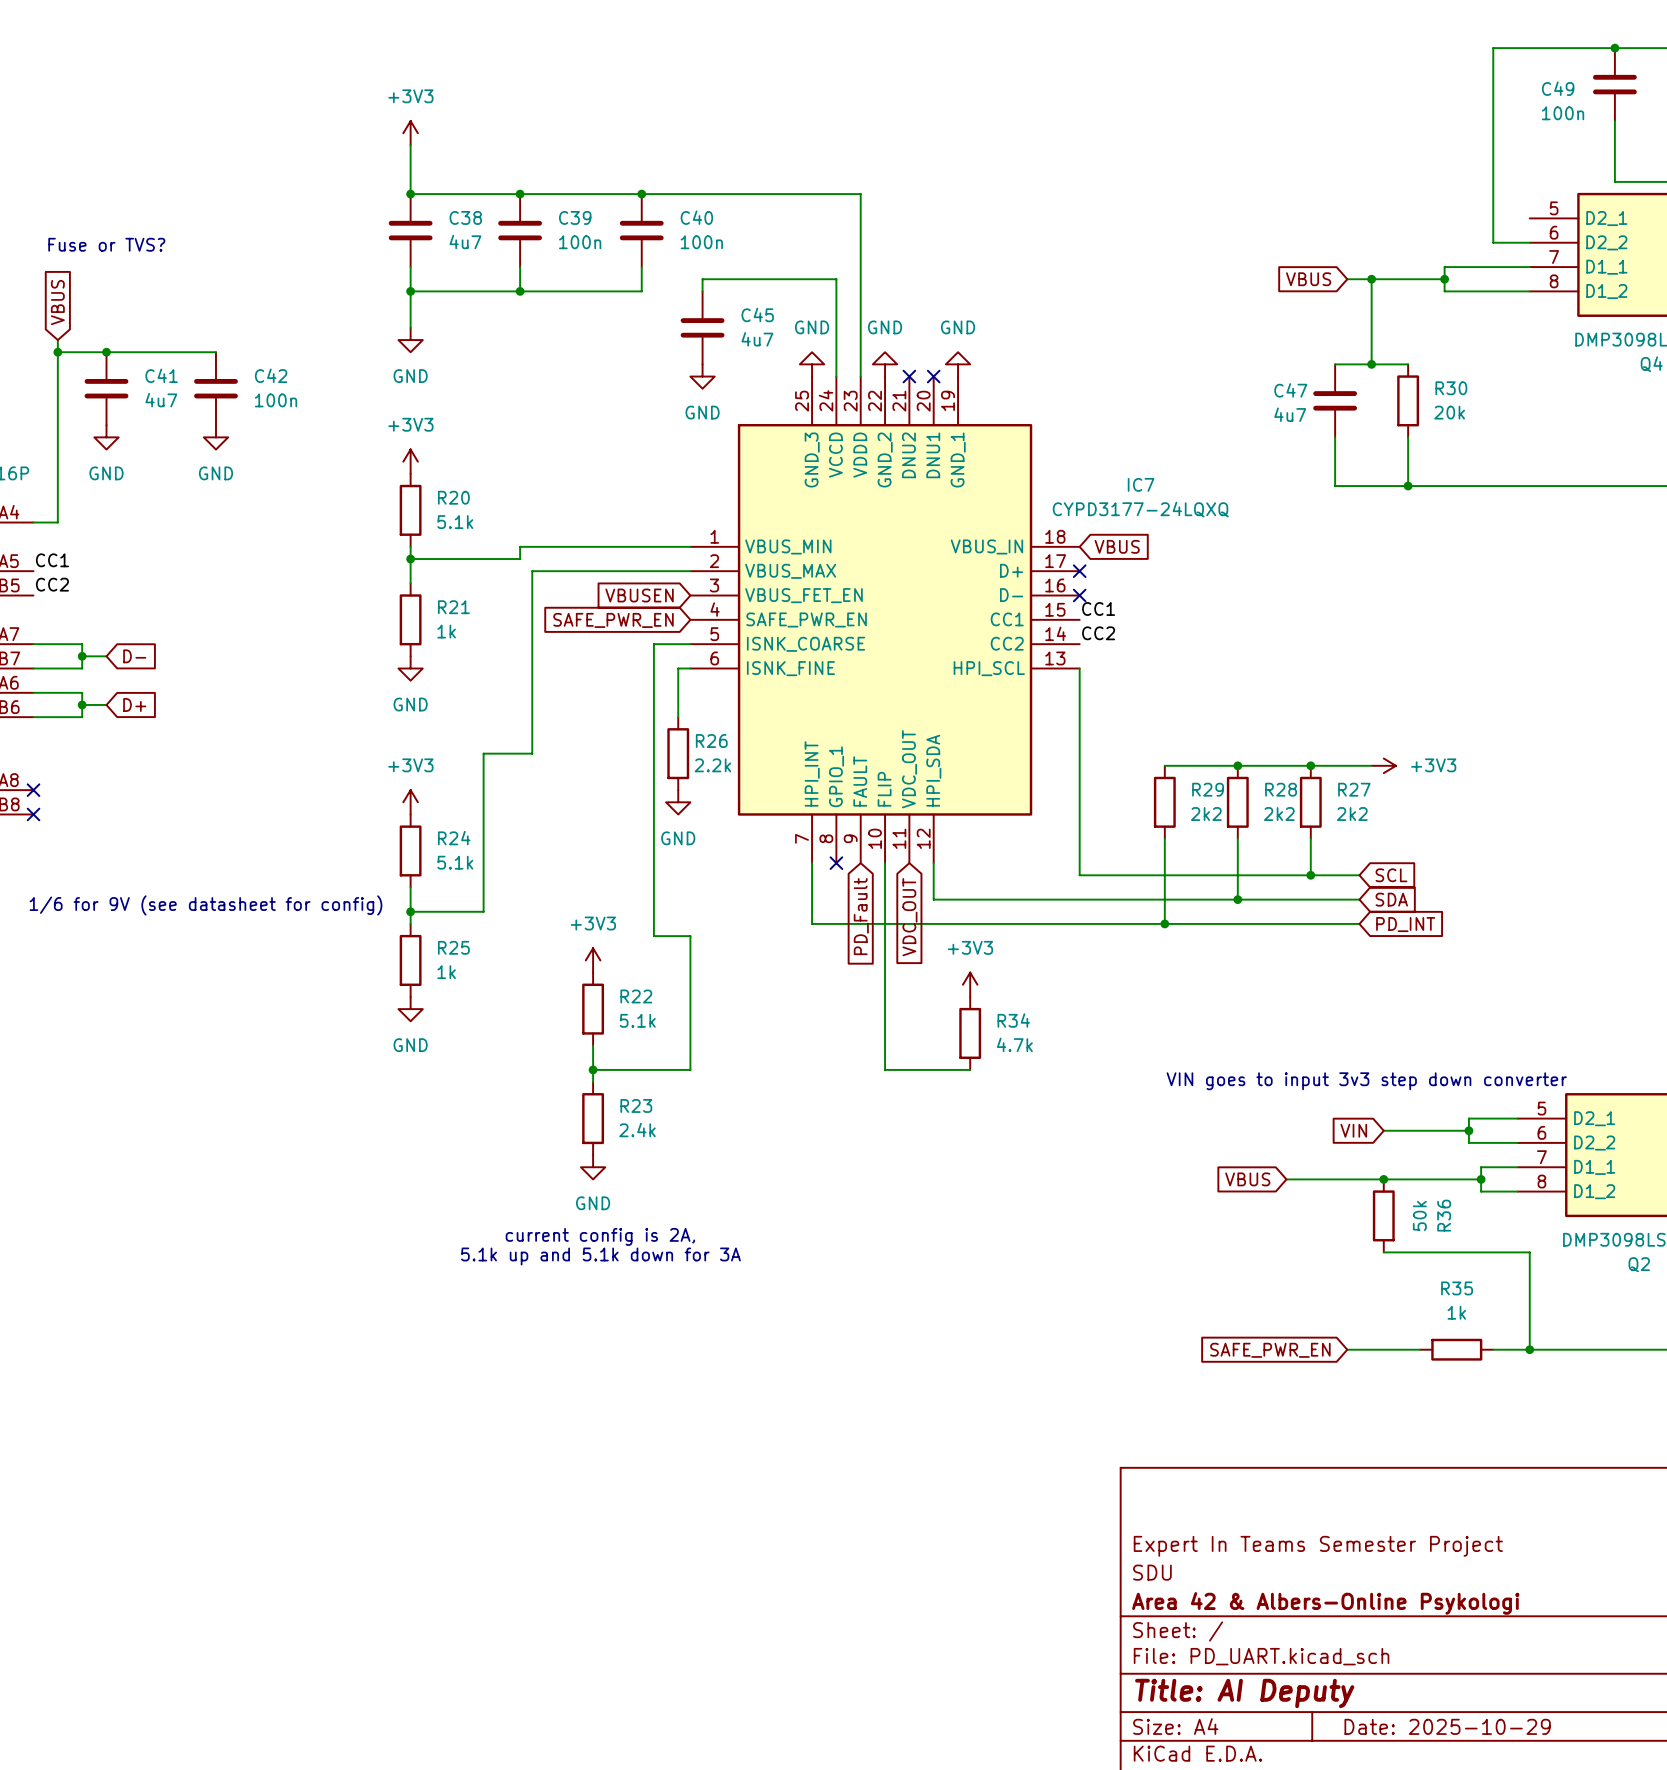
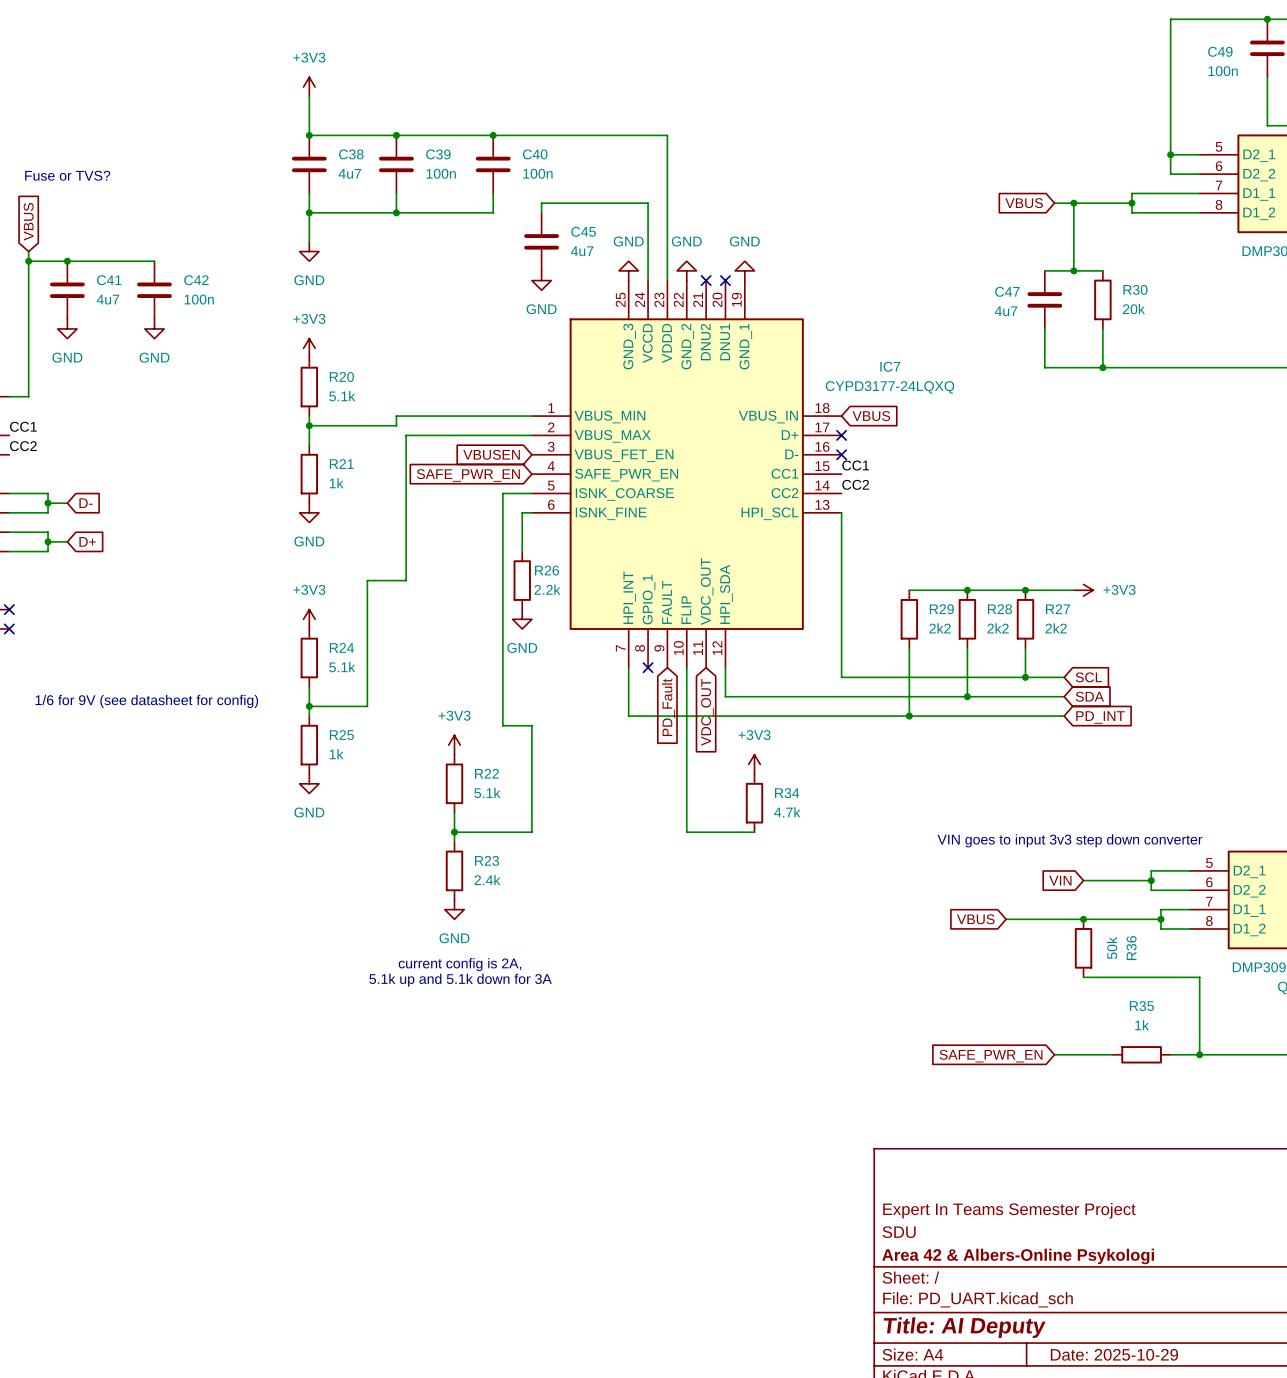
wire: none -> (1170, 154) (1199, 154)
junction: none -> (1170, 154)

